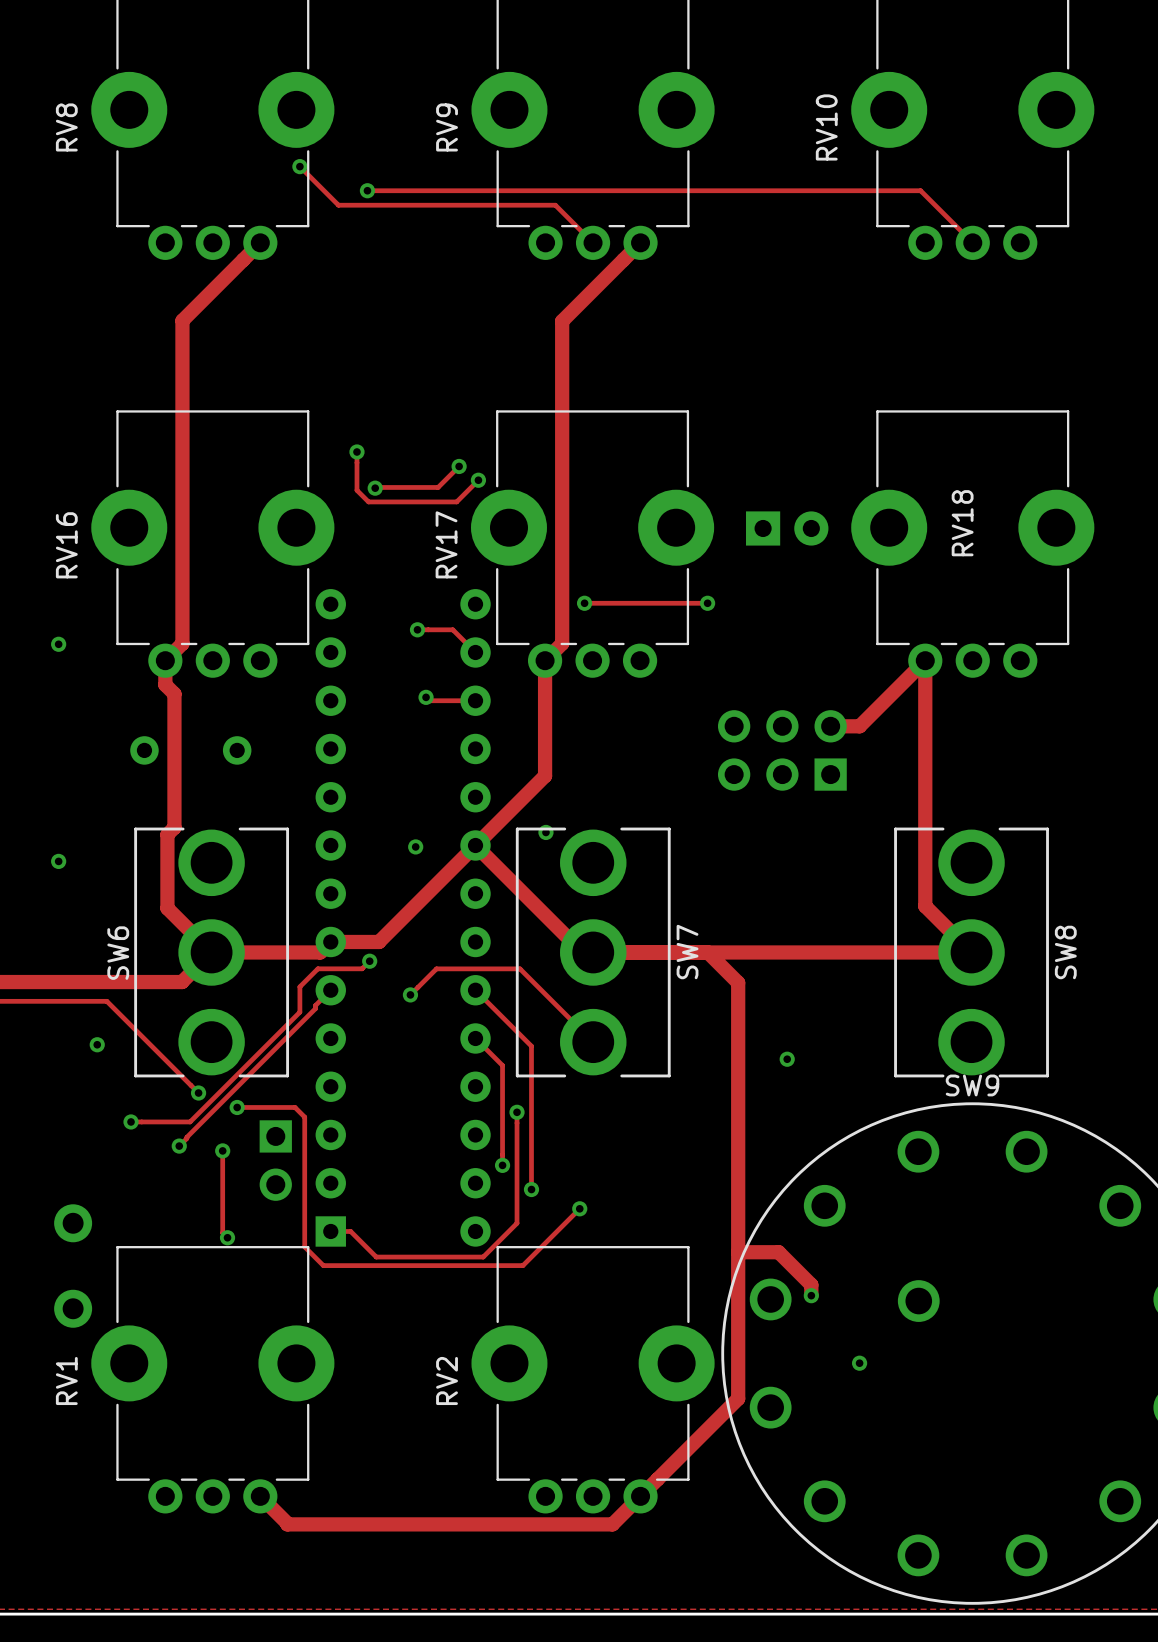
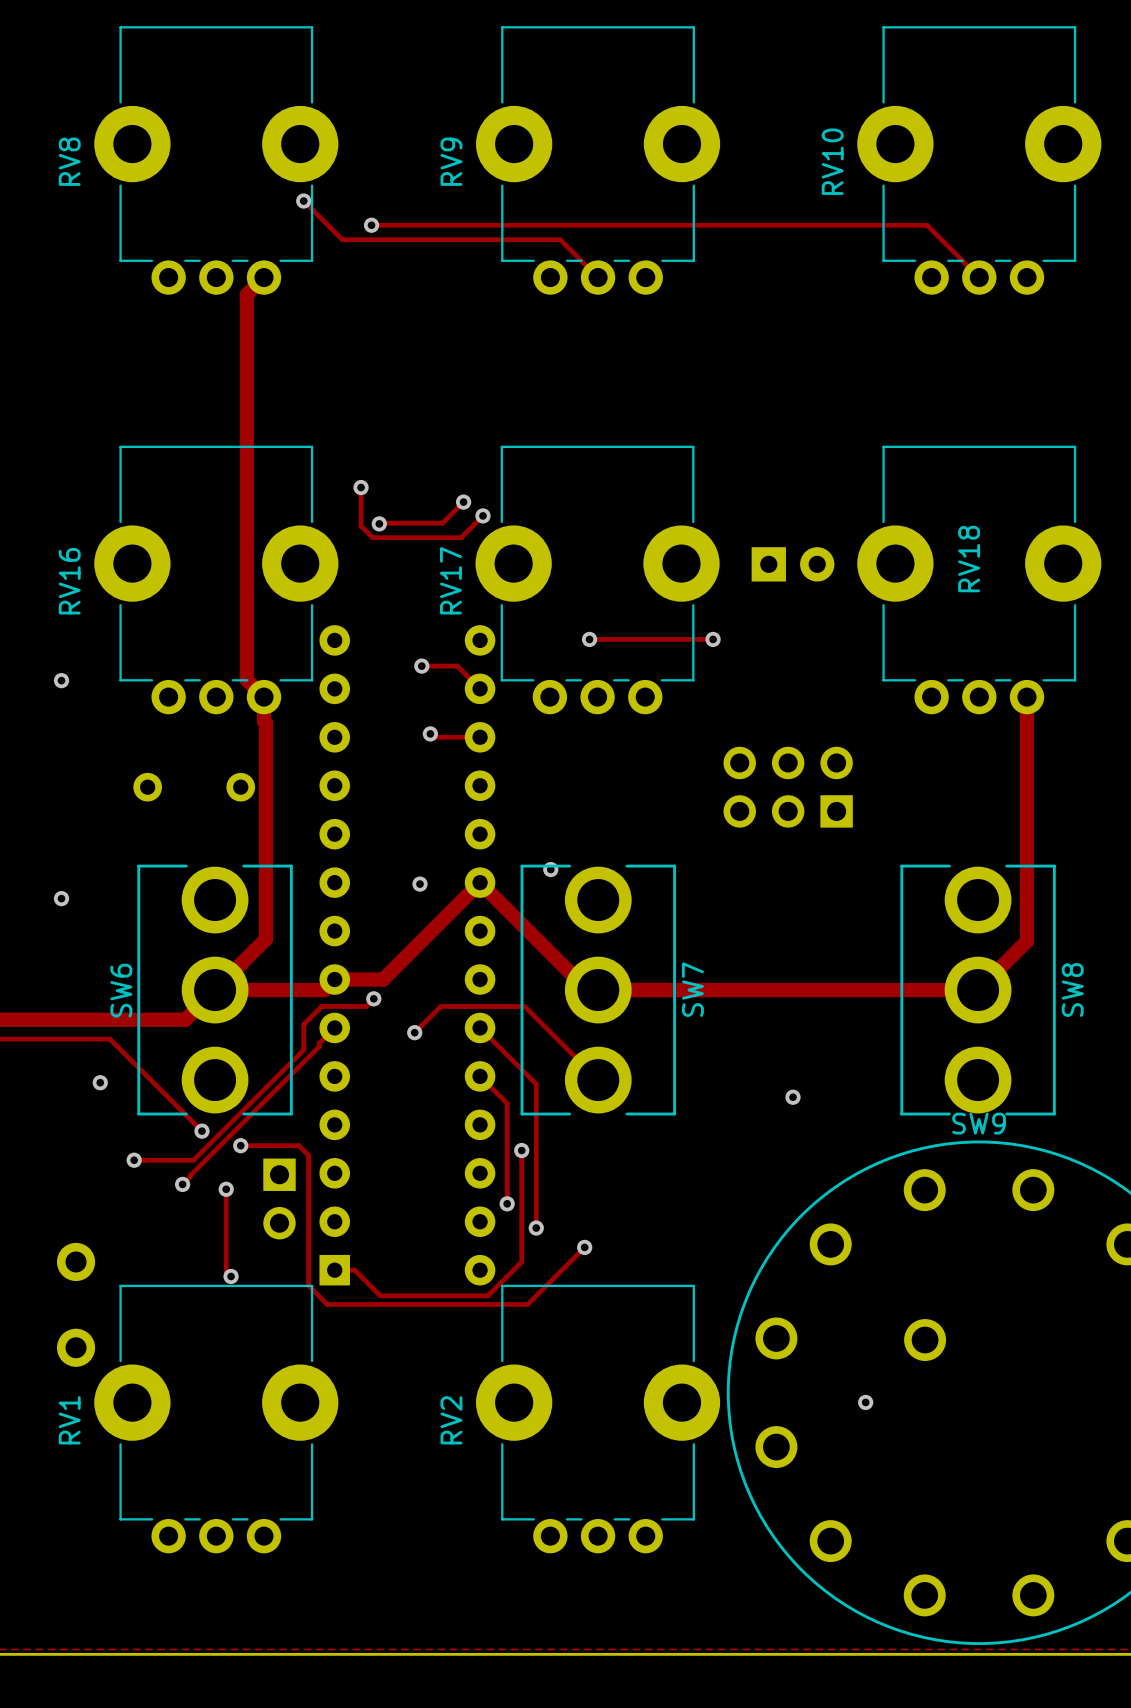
track: (640, 242) (562, 321) (562, 643) (545, 660) (545, 775) (475, 845) -> none
track: (243, 259) (182, 320) (182, 643) (165, 660) (165, 684) (174, 693) (174, 827) (167, 834) (167, 908) (211, 952) -> (246, 294) (246, 679) (264, 697) (264, 721) (266, 723) (266, 939) (215, 990)
track: (830, 726) (859, 726) (925, 660) (925, 906) (971, 952) -> (1027, 697) (1027, 941) (978, 990)
track: (707, 952) (738, 982) (738, 1398) (612, 1524) (287, 1524) (260, 1496) -> none
track: (738, 1252) (778, 1252) (811, 1284) (811, 1295) -> none
via: (811, 1295) -> none

